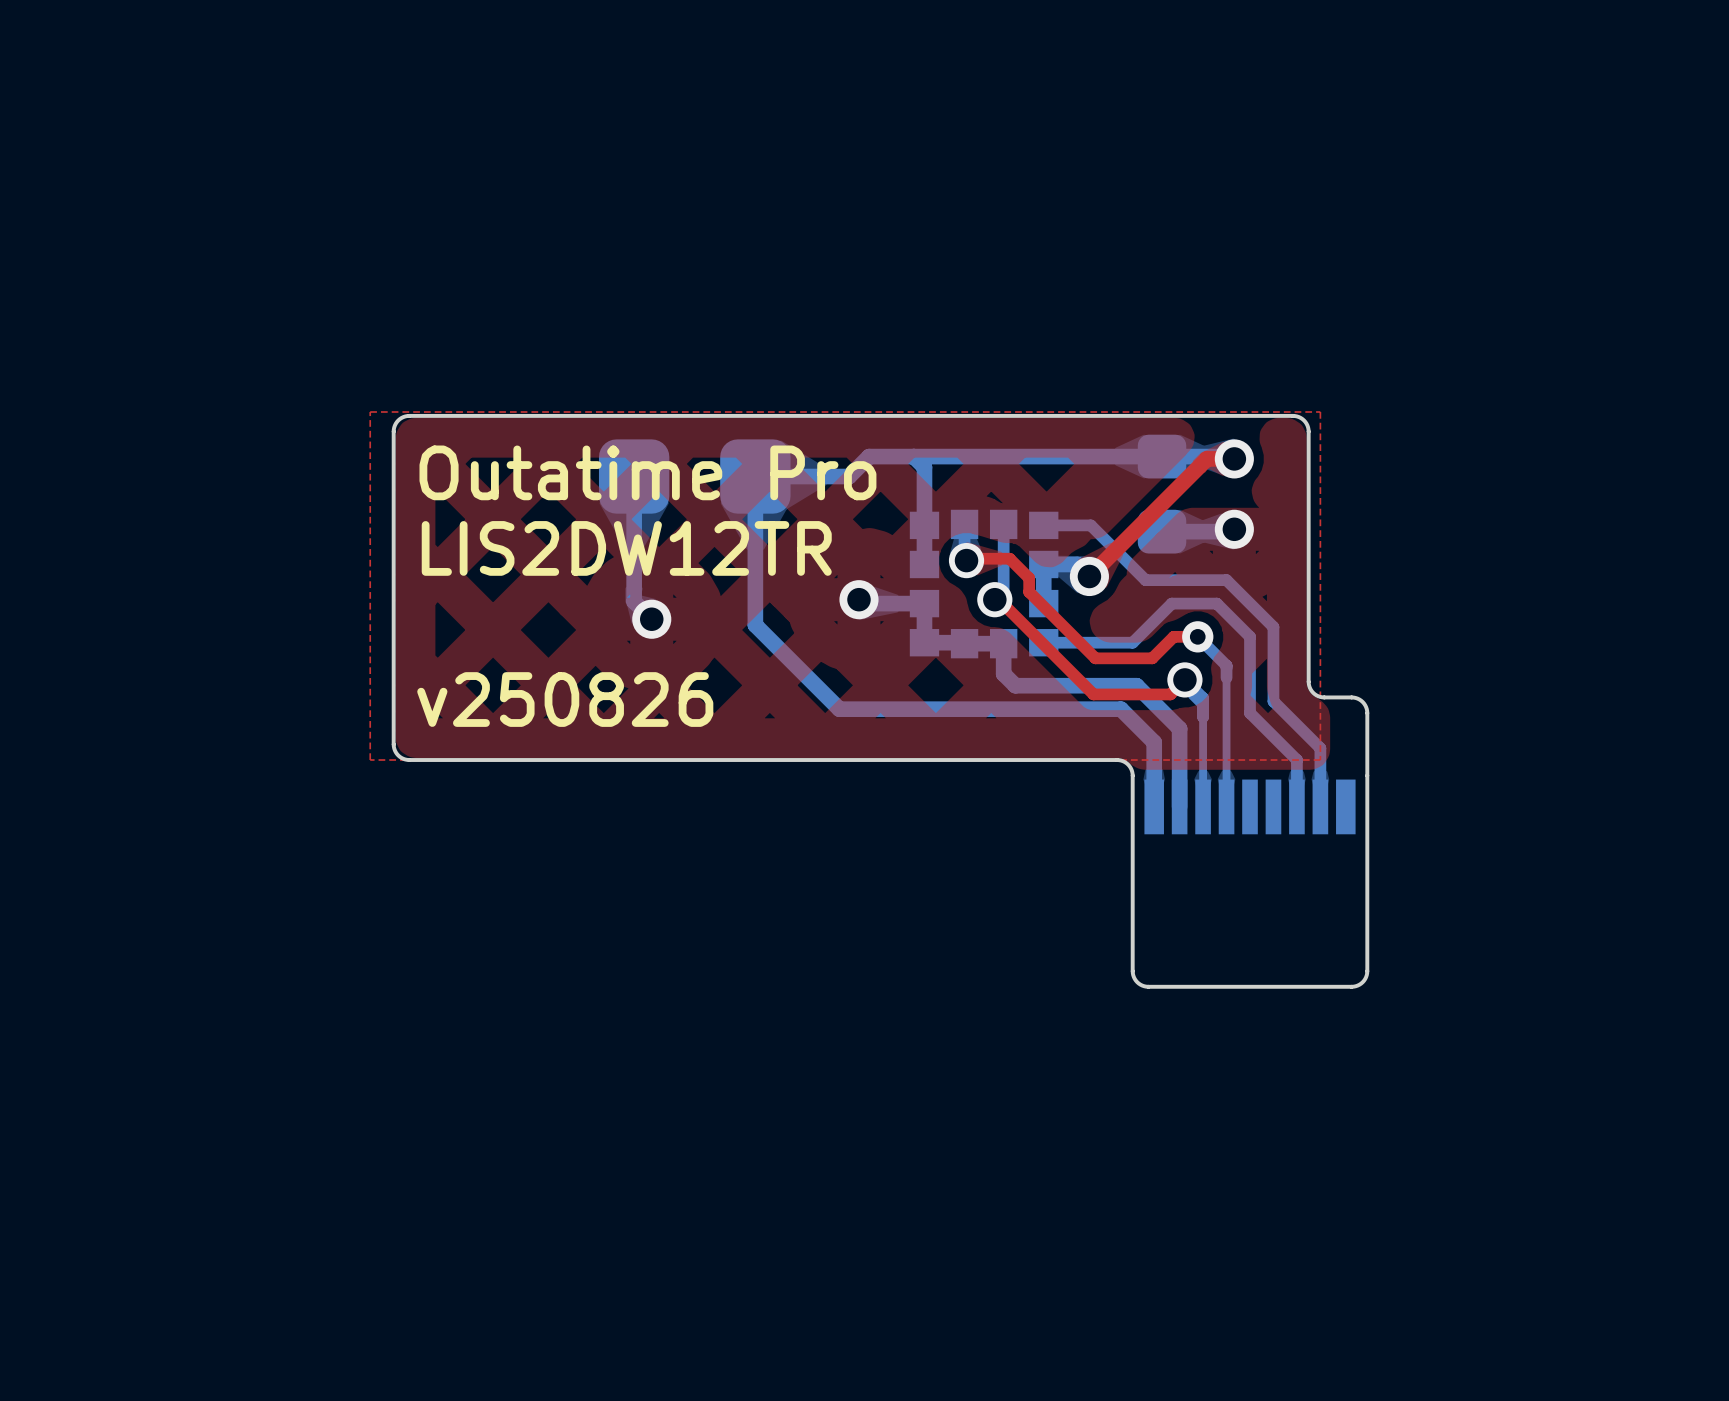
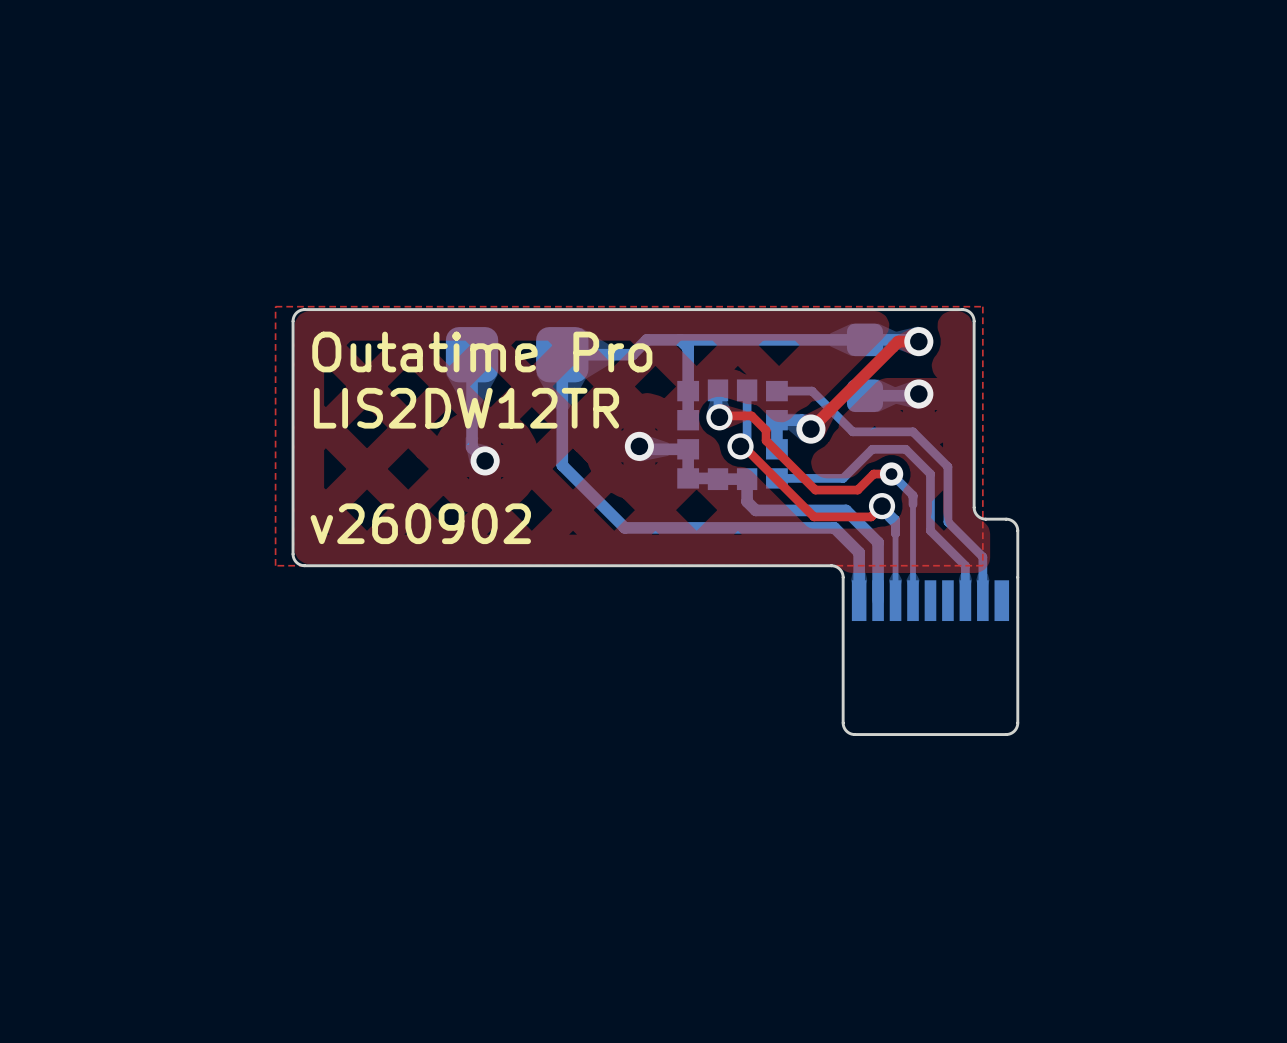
text: v250826 (565, 699) -> v260902 (420, 523)

